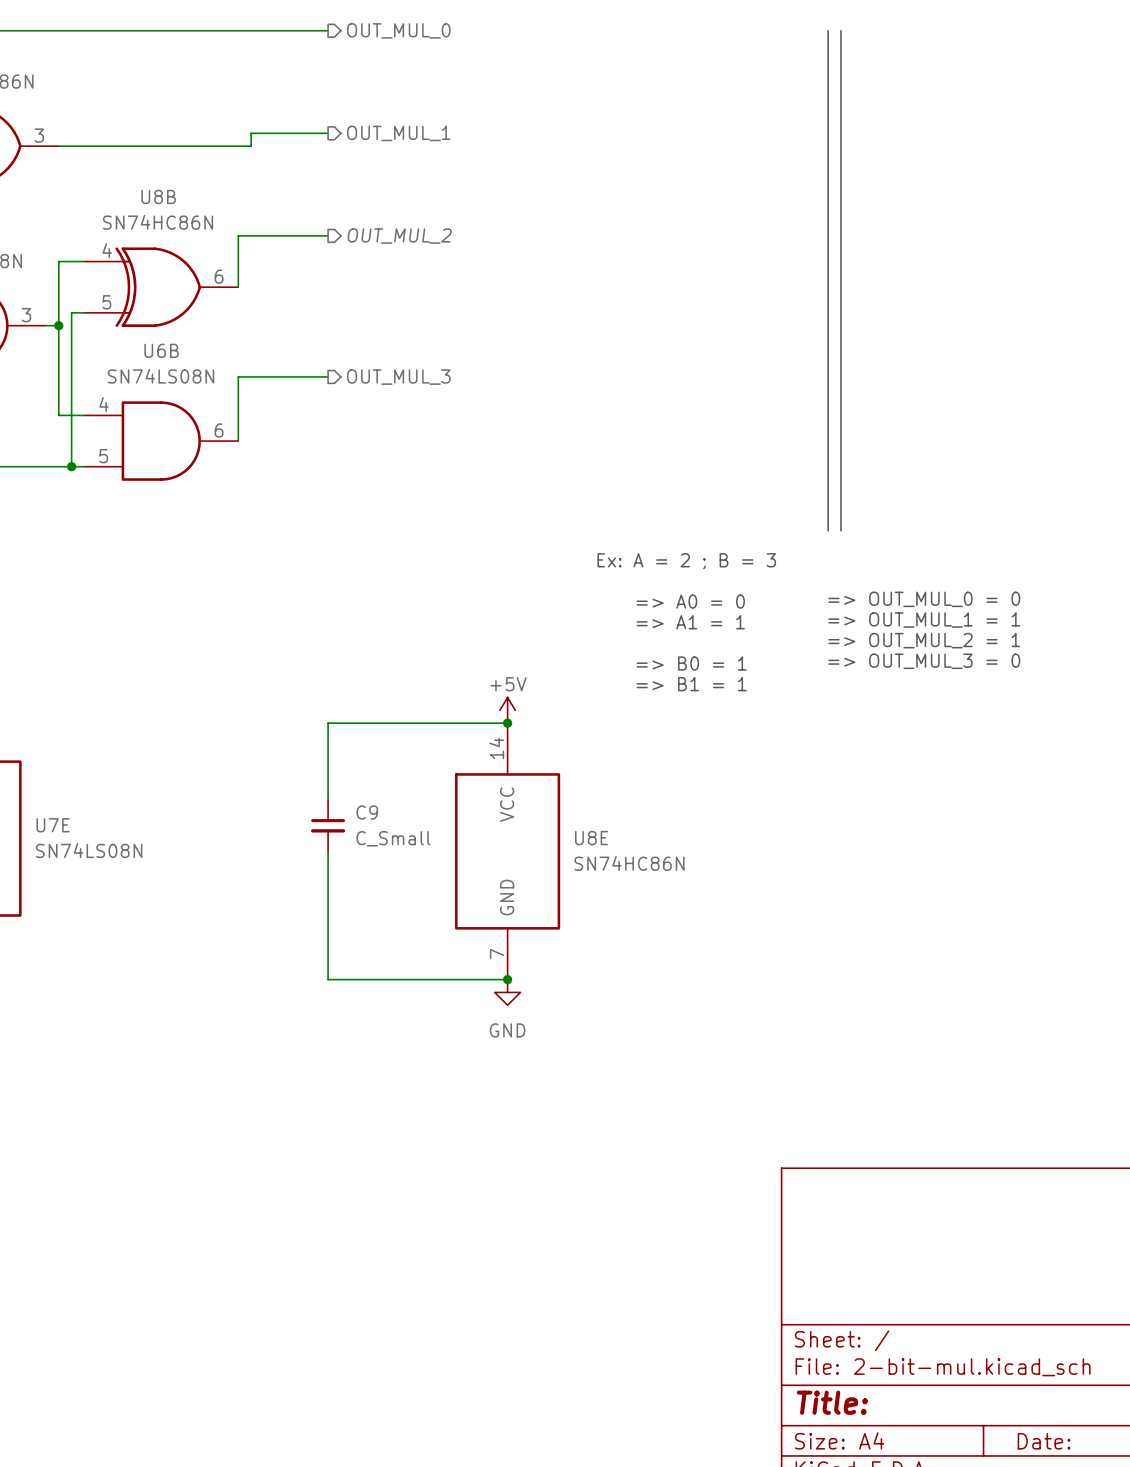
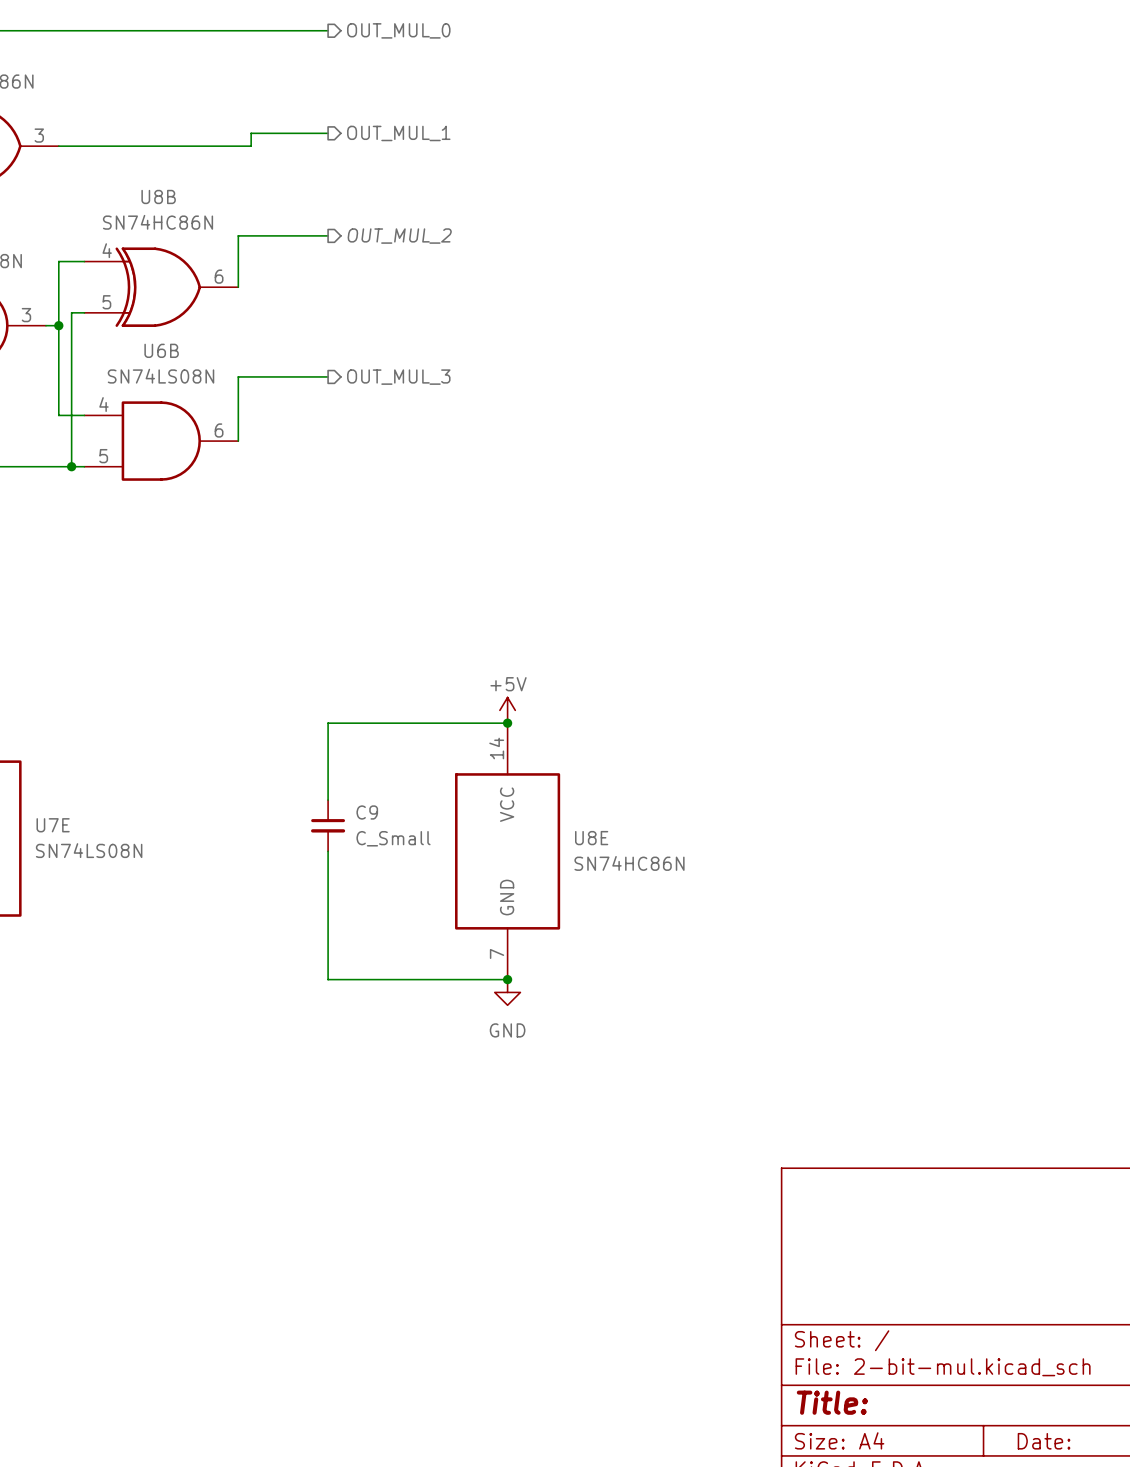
line: (828, 30) (828, 530) -> none
line: (840, 30) (840, 530) -> none
text: Ex: A = 2 ; B = 3 (686, 561) -> none
text: => OUT_MUL_0 = 0 (924, 599) -> none
text: => A0 = 0 (690, 601) -> none
text: => OUT_MUL_1 = 1 (924, 620) -> none
text: => A1 = 1 (690, 622) -> none
text: => OUT_MUL_2 = 1 (924, 640) -> none
text: => OUT_MUL_3 = 0 (924, 661) -> none
text: => B0 = 1 (691, 663) -> none
text: => B1 = 1 (691, 684) -> none

